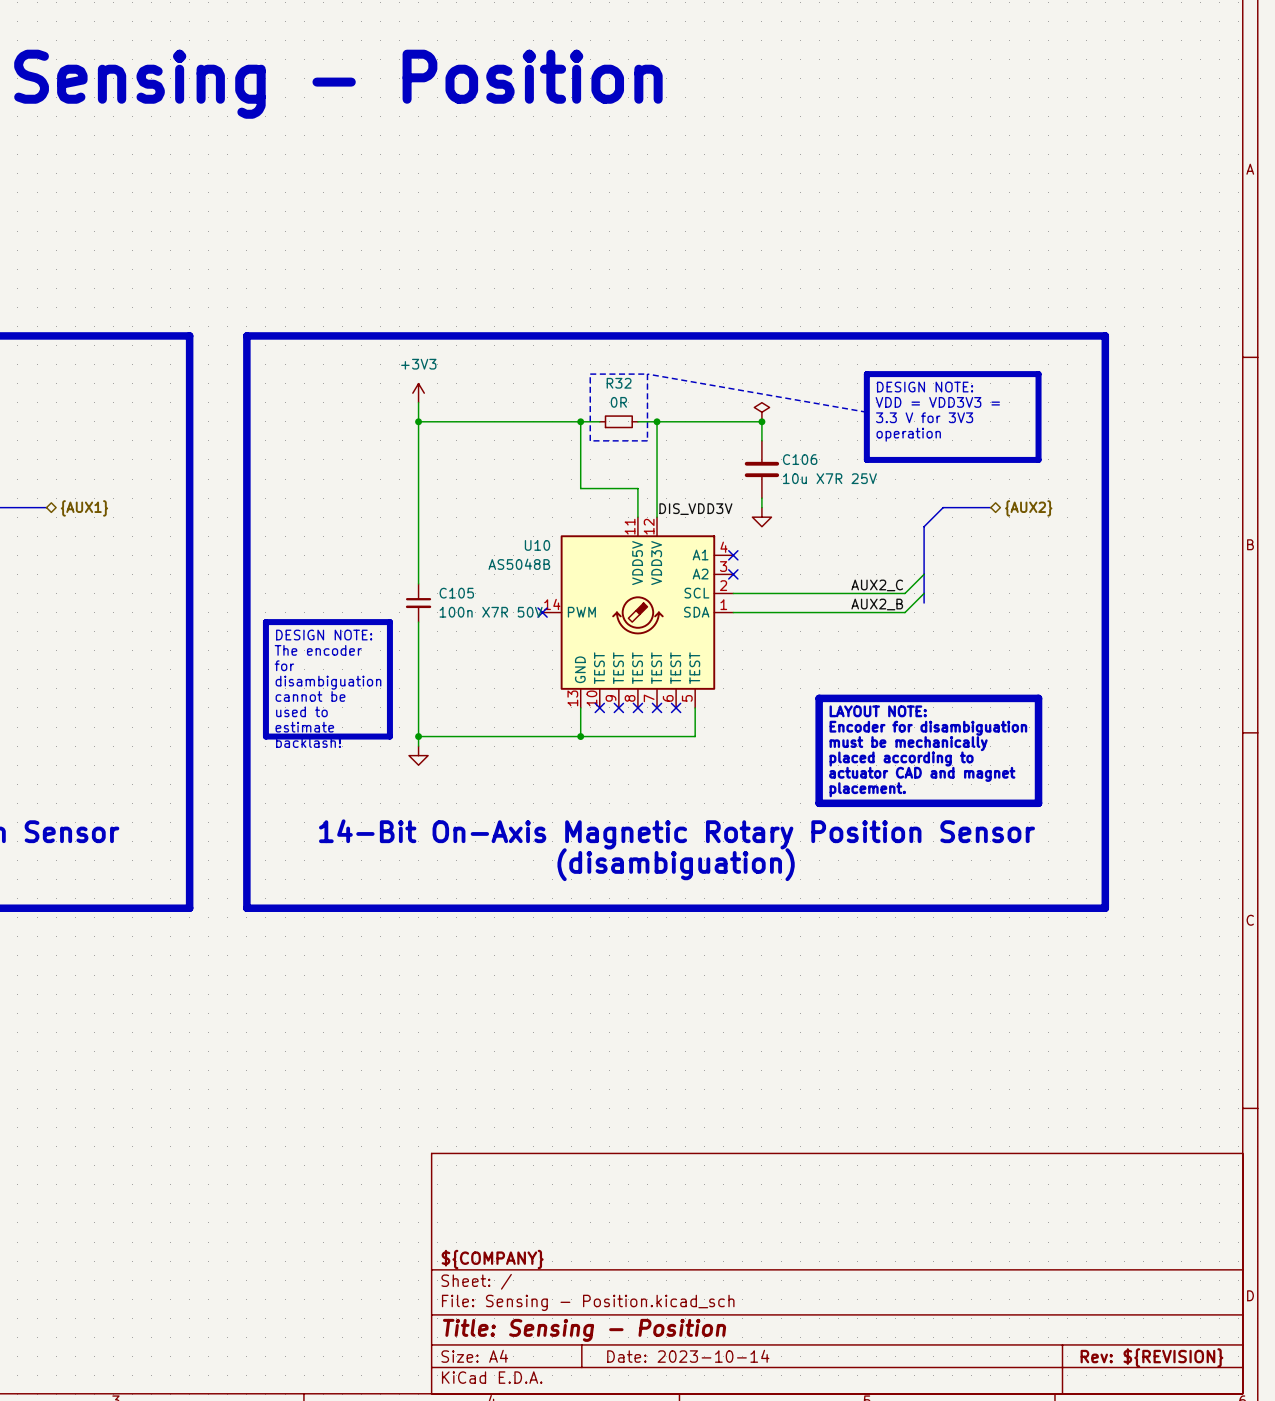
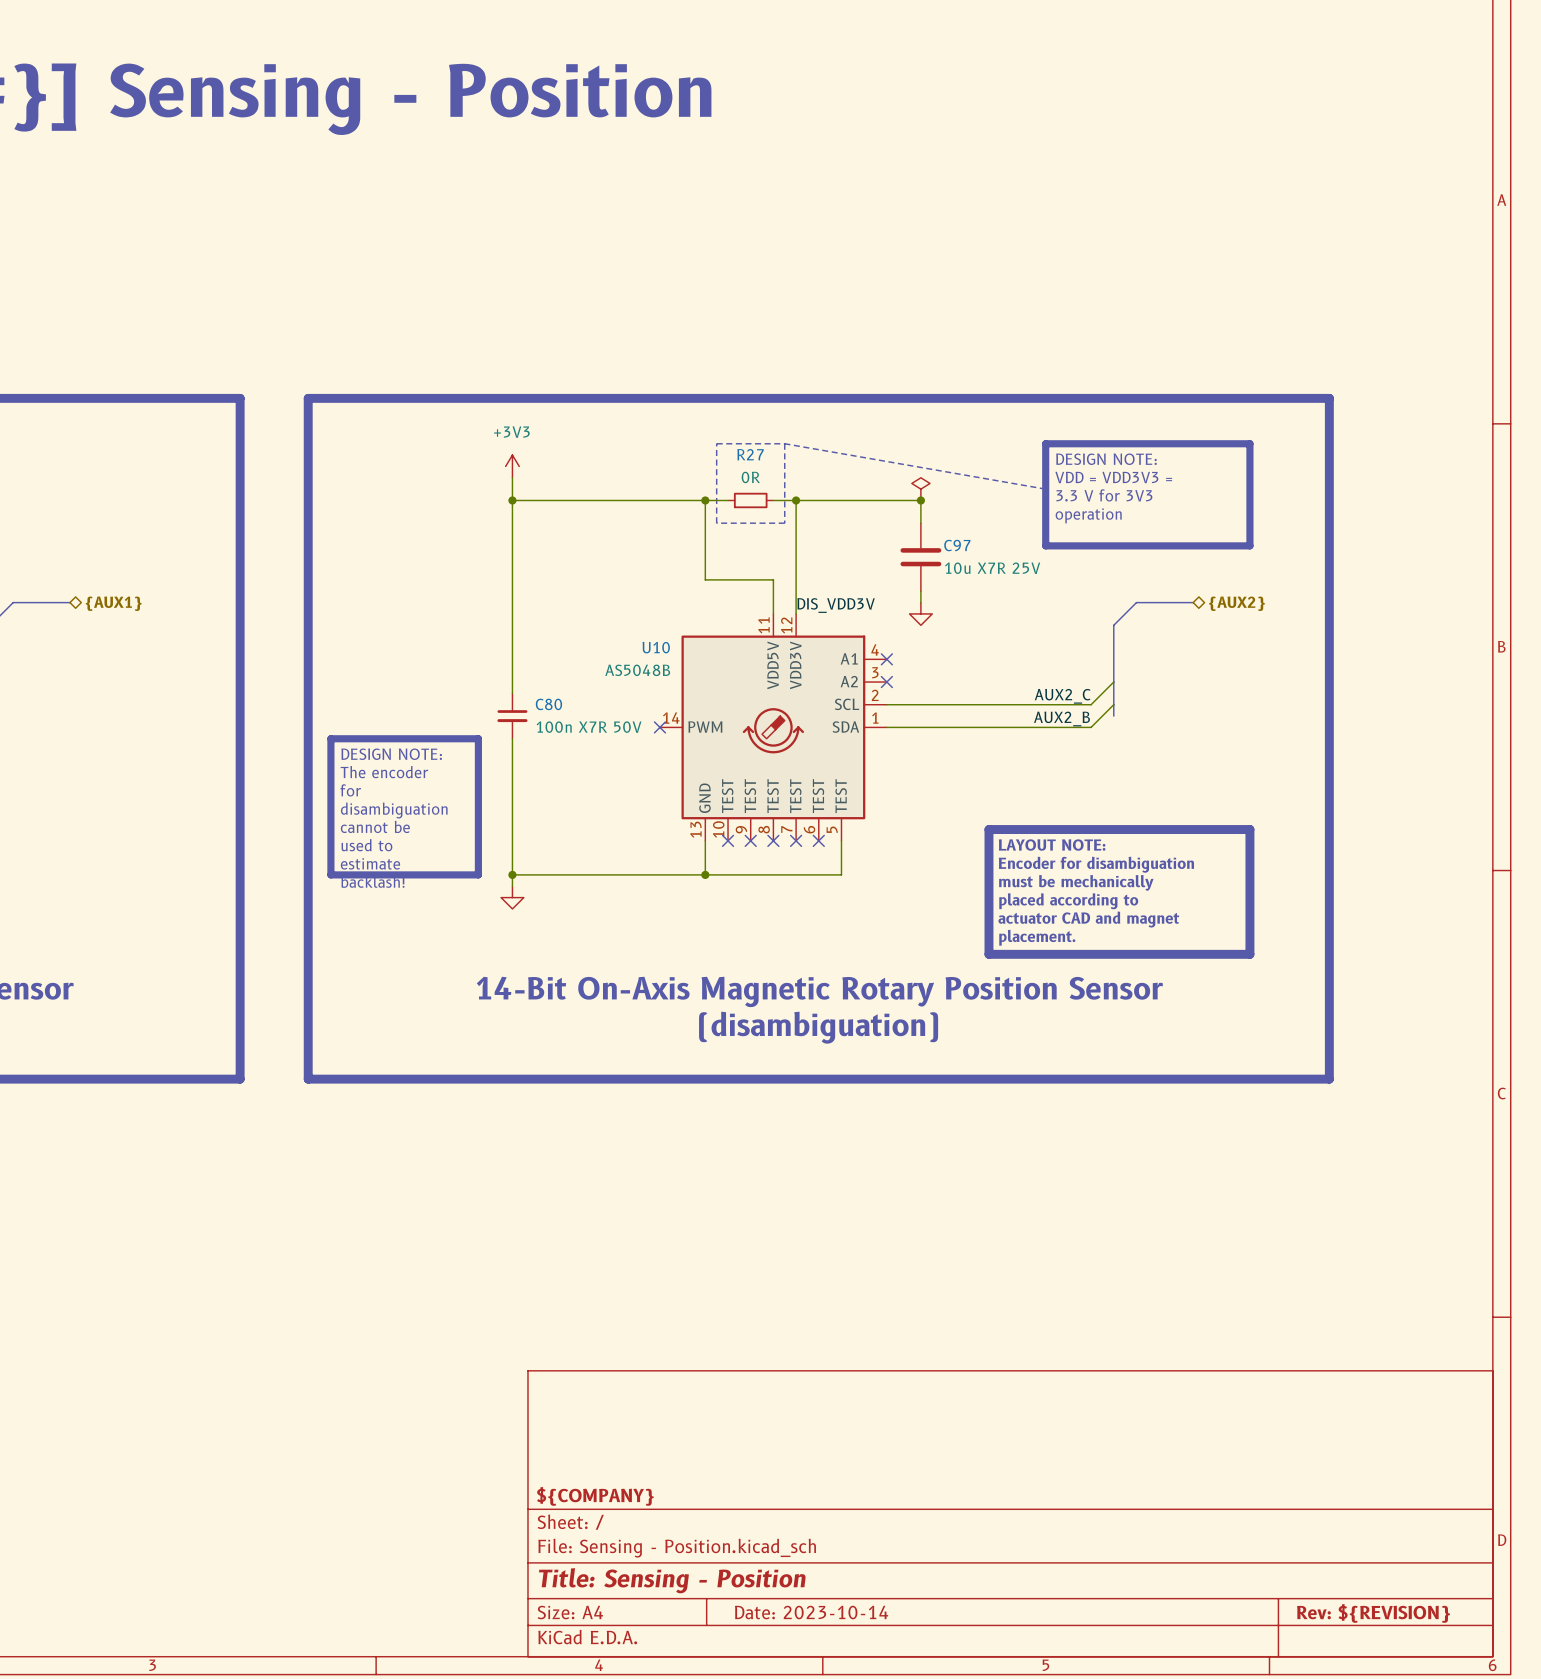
R32 name: R32 (619, 383) -> R27 (750, 454)
C106 name: C106 (800, 459) -> C97 (957, 545)
C105 name: C105 (456, 593) -> C80 (548, 704)

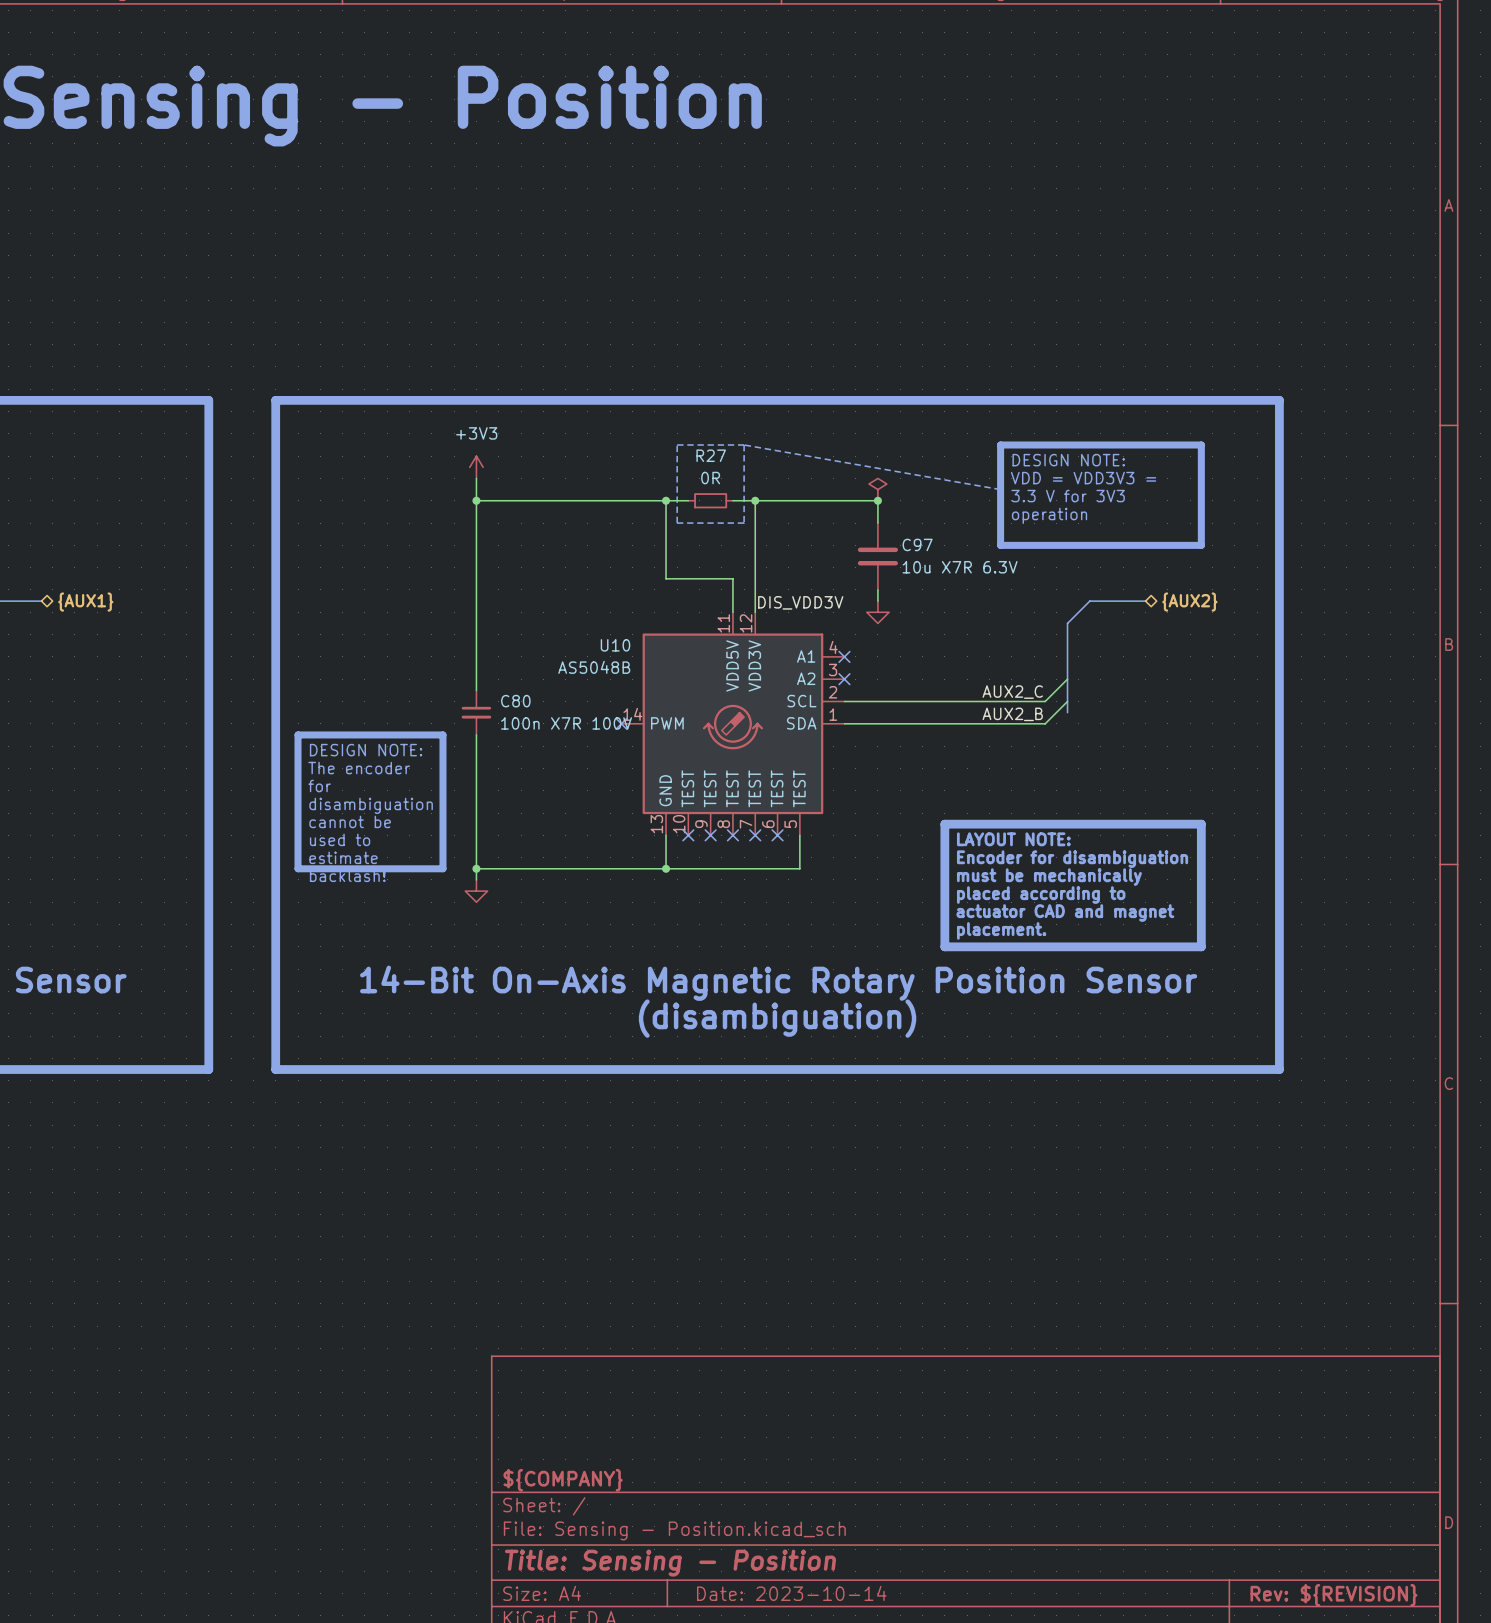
C97 value: 10u X7R 25V (992, 568) -> 10u X7R 6.3V (960, 567)
C80 value: 100n X7R 50V (589, 727) -> 100n X7R 100V (566, 723)

